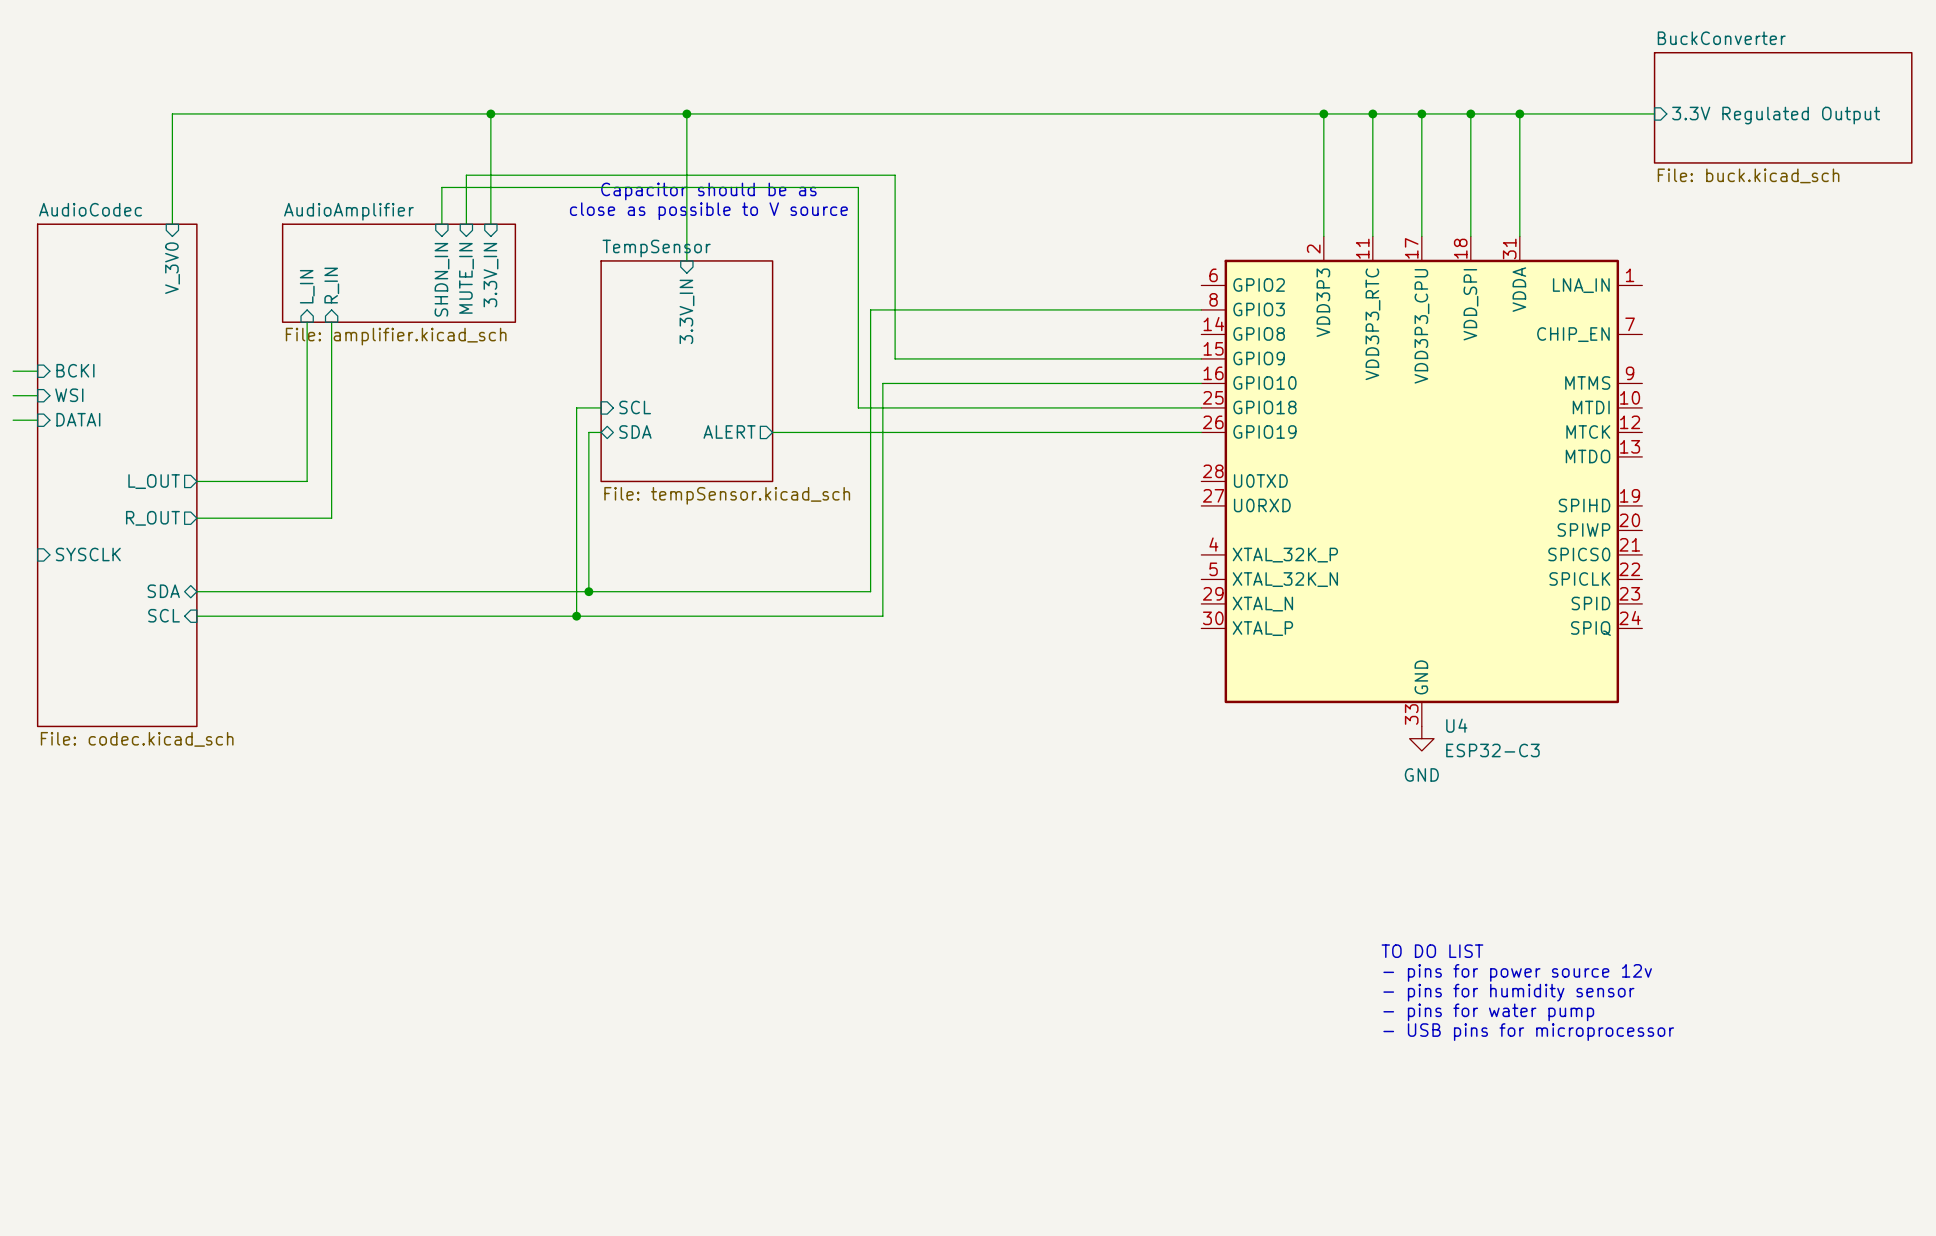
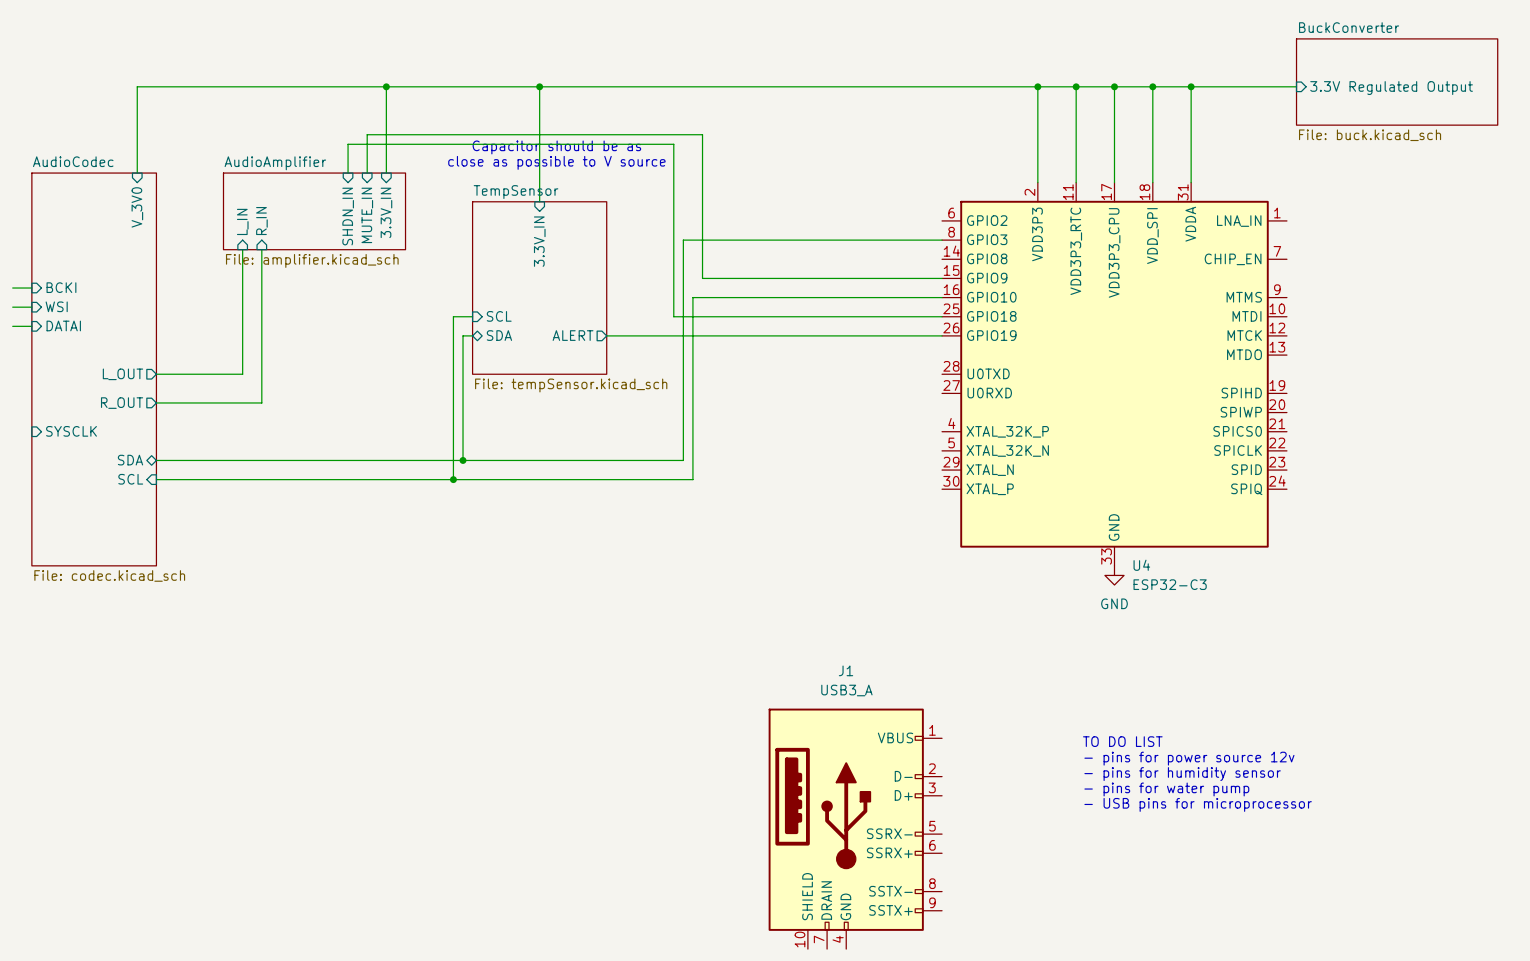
J1: none -> USB3_A (855, 828)

